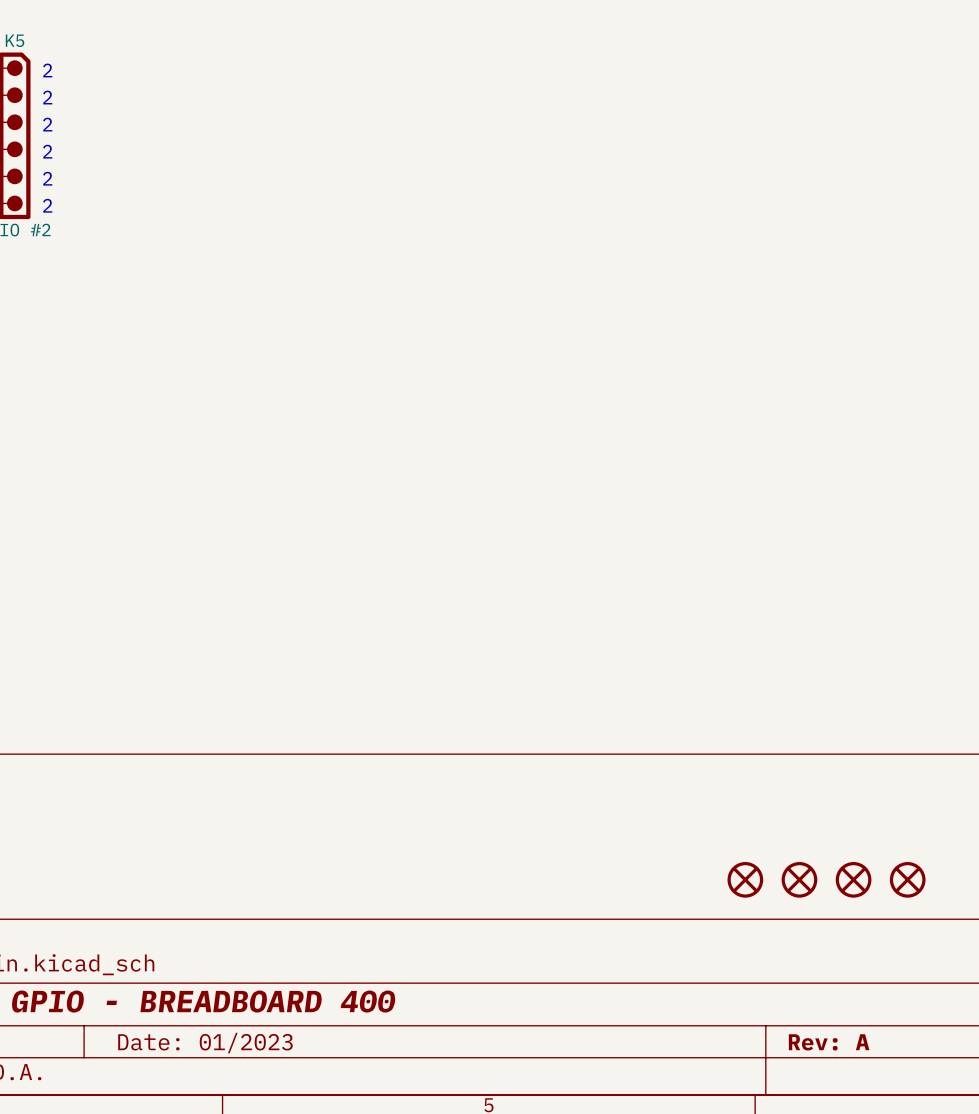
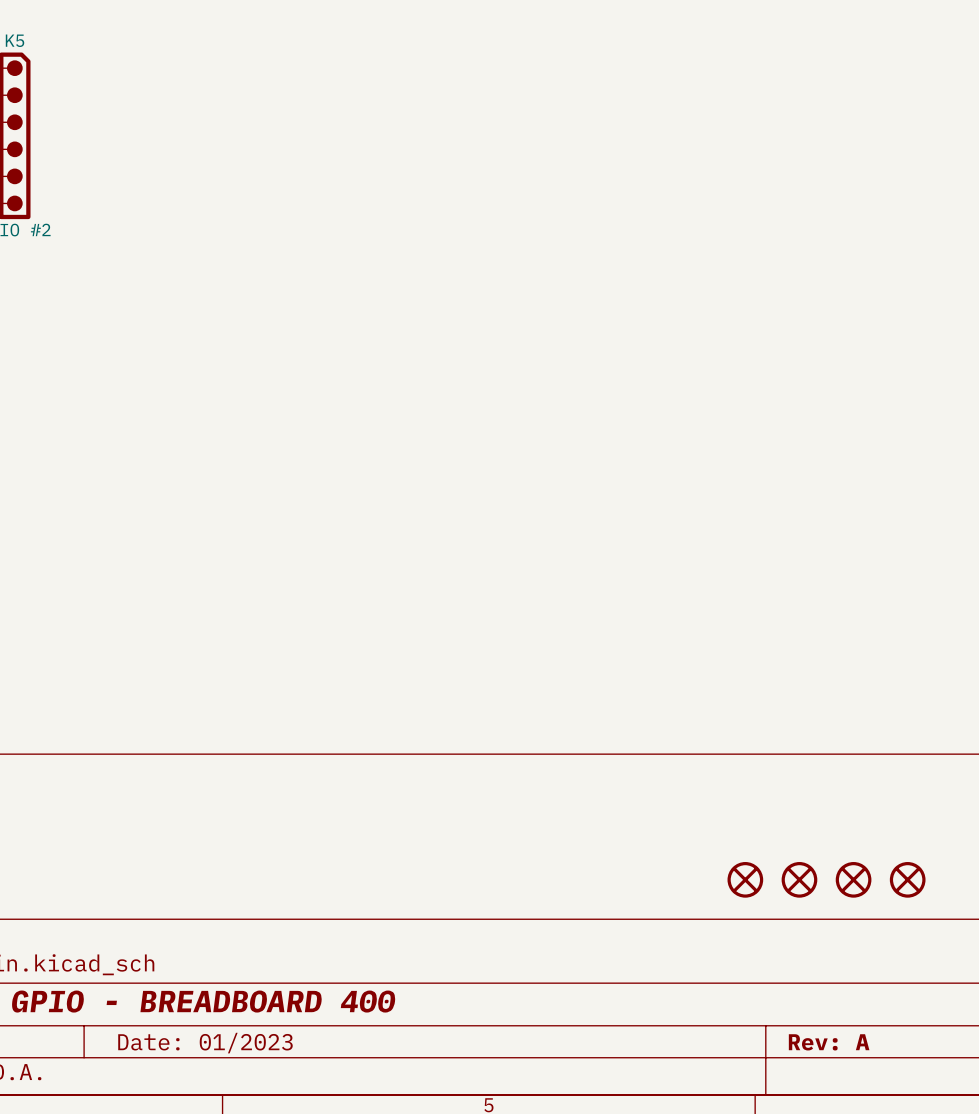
text: 2 (47, 70) -> none
text: 2 (47, 97) -> none
text: 2 (47, 124) -> none
text: 2 (47, 151) -> none
text: 2 (47, 178) -> none
text: 2 (47, 205) -> none

